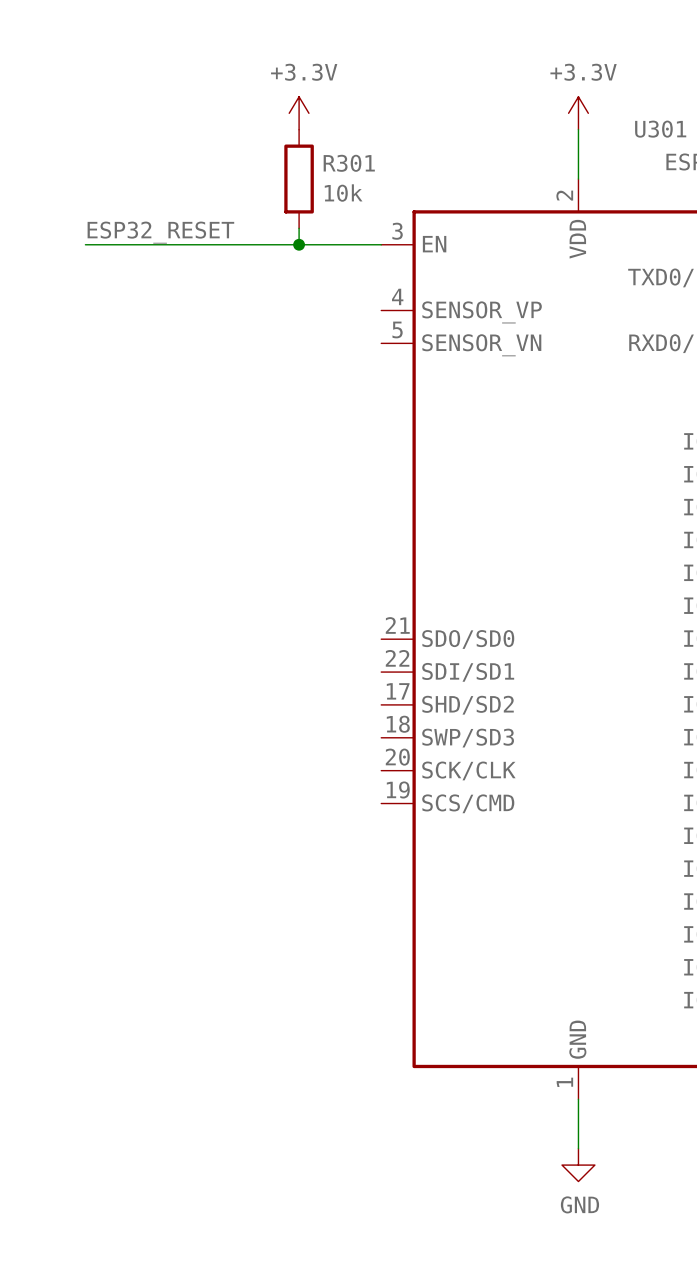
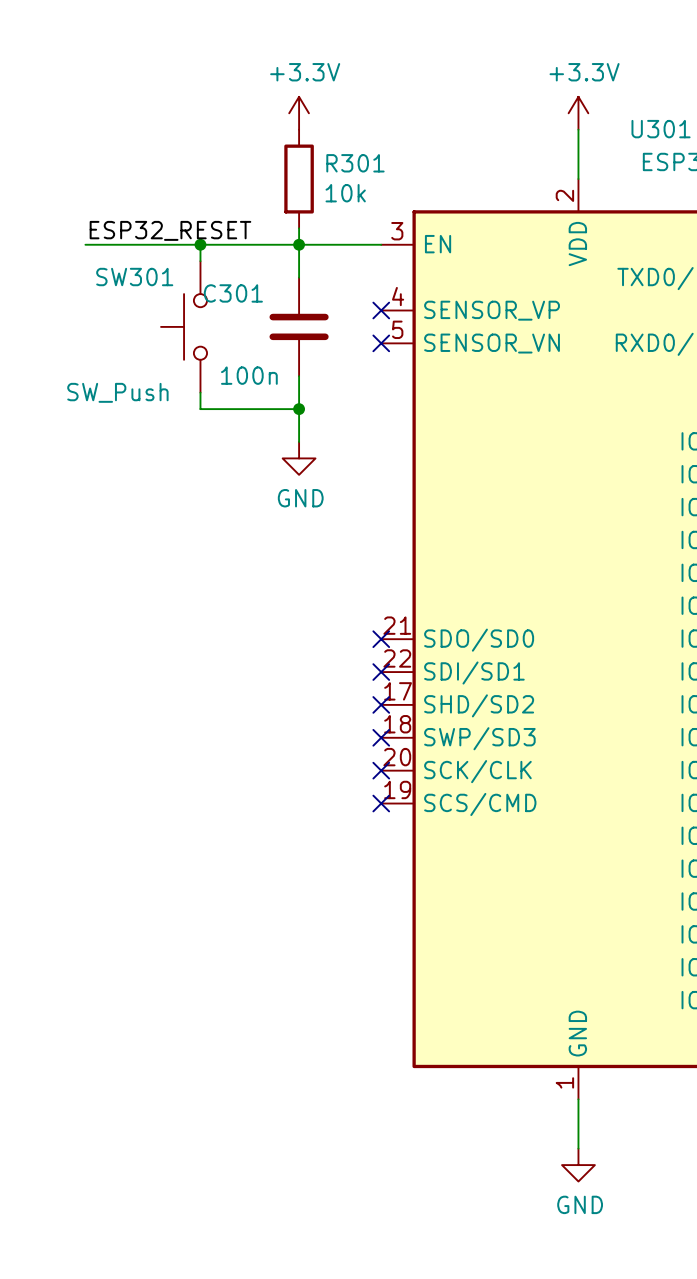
wire: none -> (200, 244) (200, 261)
junction: none -> (200, 244)
wire: none -> (299, 244) (299, 277)
no-connect mark: none -> (381, 310)
SW301: none -> SW_Push (184, 326)
C301: none -> 100n (299, 326)
no-connect mark: none -> (381, 343)
wire: none -> (299, 376) (299, 441)
wire: none -> (200, 392) (200, 409) (299, 409)
junction: none -> (299, 409)
power symbol: none -> GND (299, 458)
no-connect mark: none -> (381, 639)
no-connect mark: none -> (381, 672)
no-connect mark: none -> (381, 704)
no-connect mark: none -> (381, 737)
no-connect mark: none -> (381, 770)
no-connect mark: none -> (381, 803)

